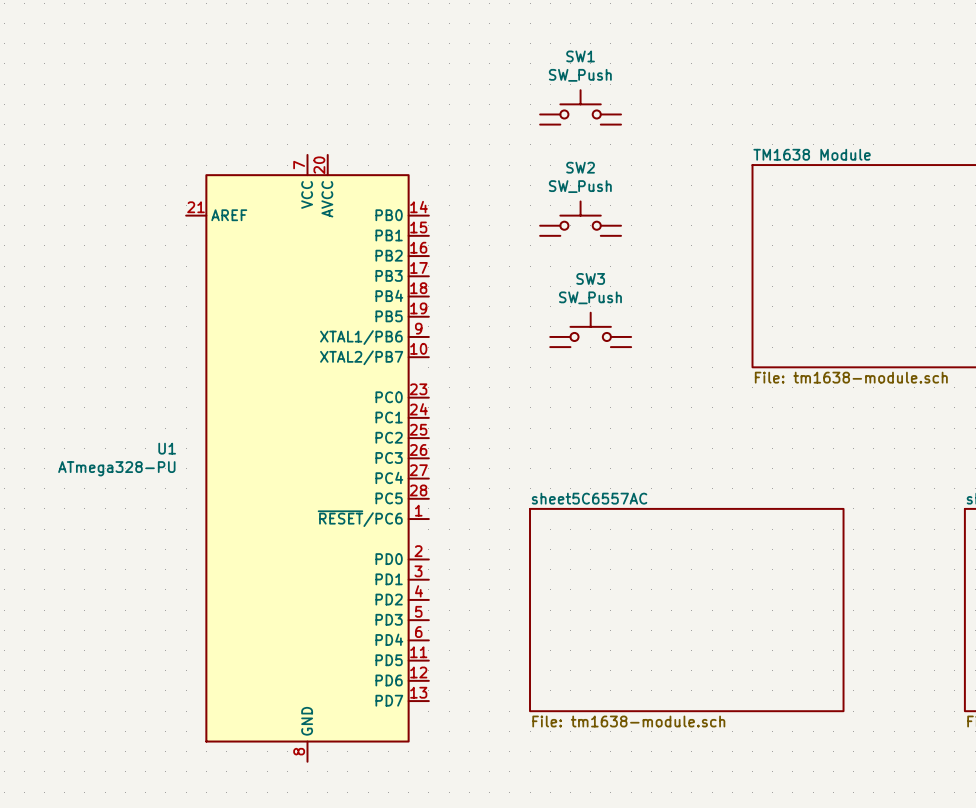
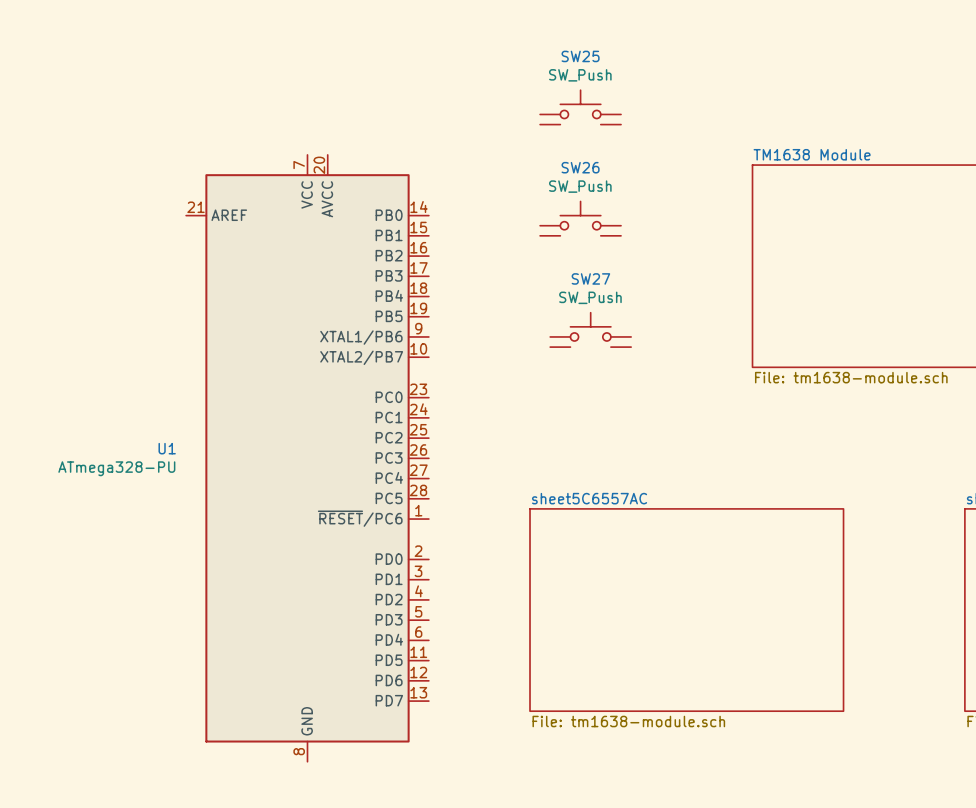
SW1 name: SW1 (580, 56) -> SW25 (580, 56)
SW2 name: SW2 (580, 167) -> SW26 (580, 167)
SW3 name: SW3 (590, 278) -> SW27 (590, 278)

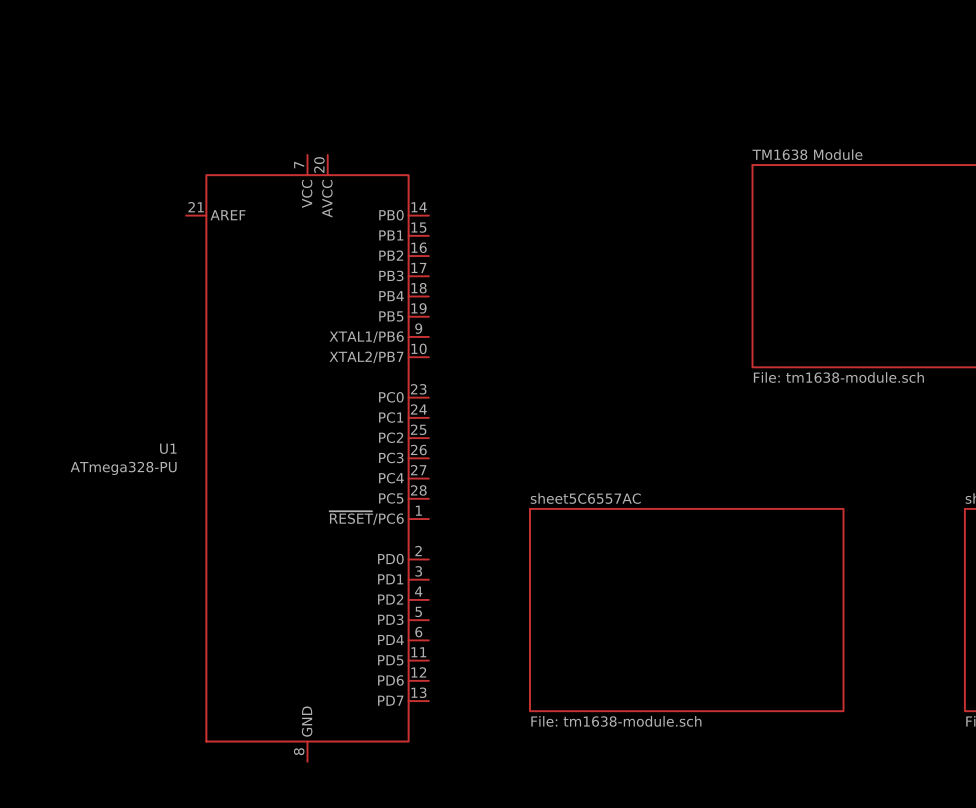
SW25: SW_Push (580, 107) -> none
SW26: SW_Push (580, 218) -> none
SW27: SW_Push (590, 329) -> none

